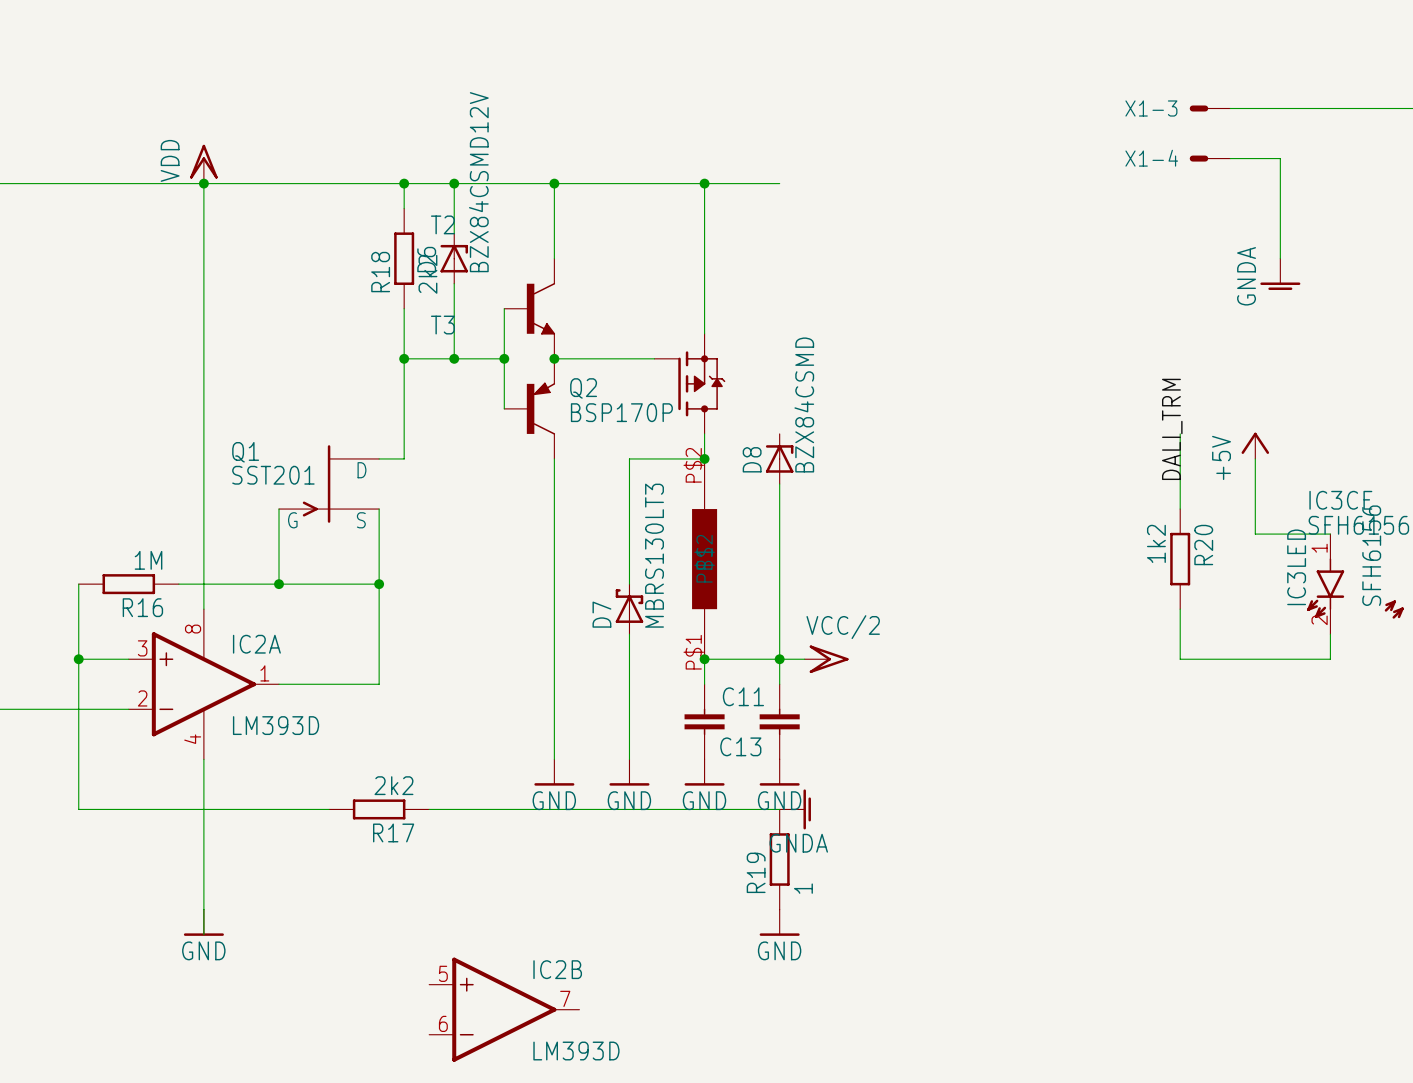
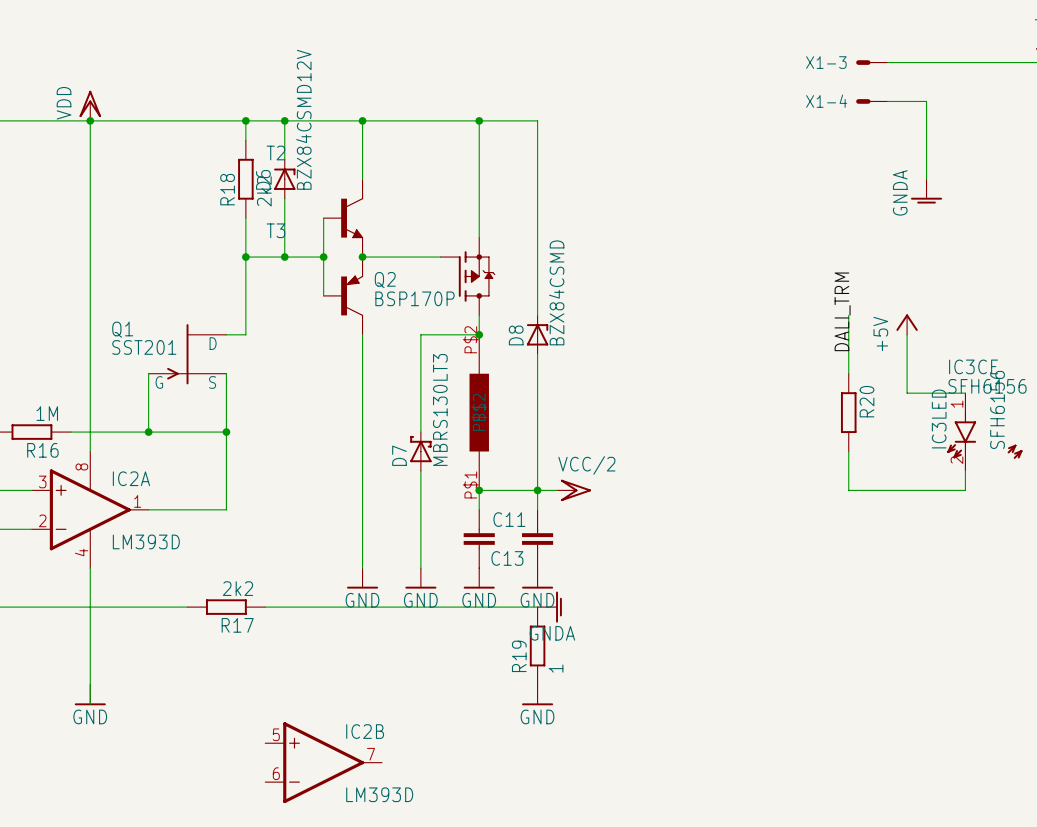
wire: none -> (537, 120) (537, 315)
R20 value: 1k2 (1156, 543) -> none

